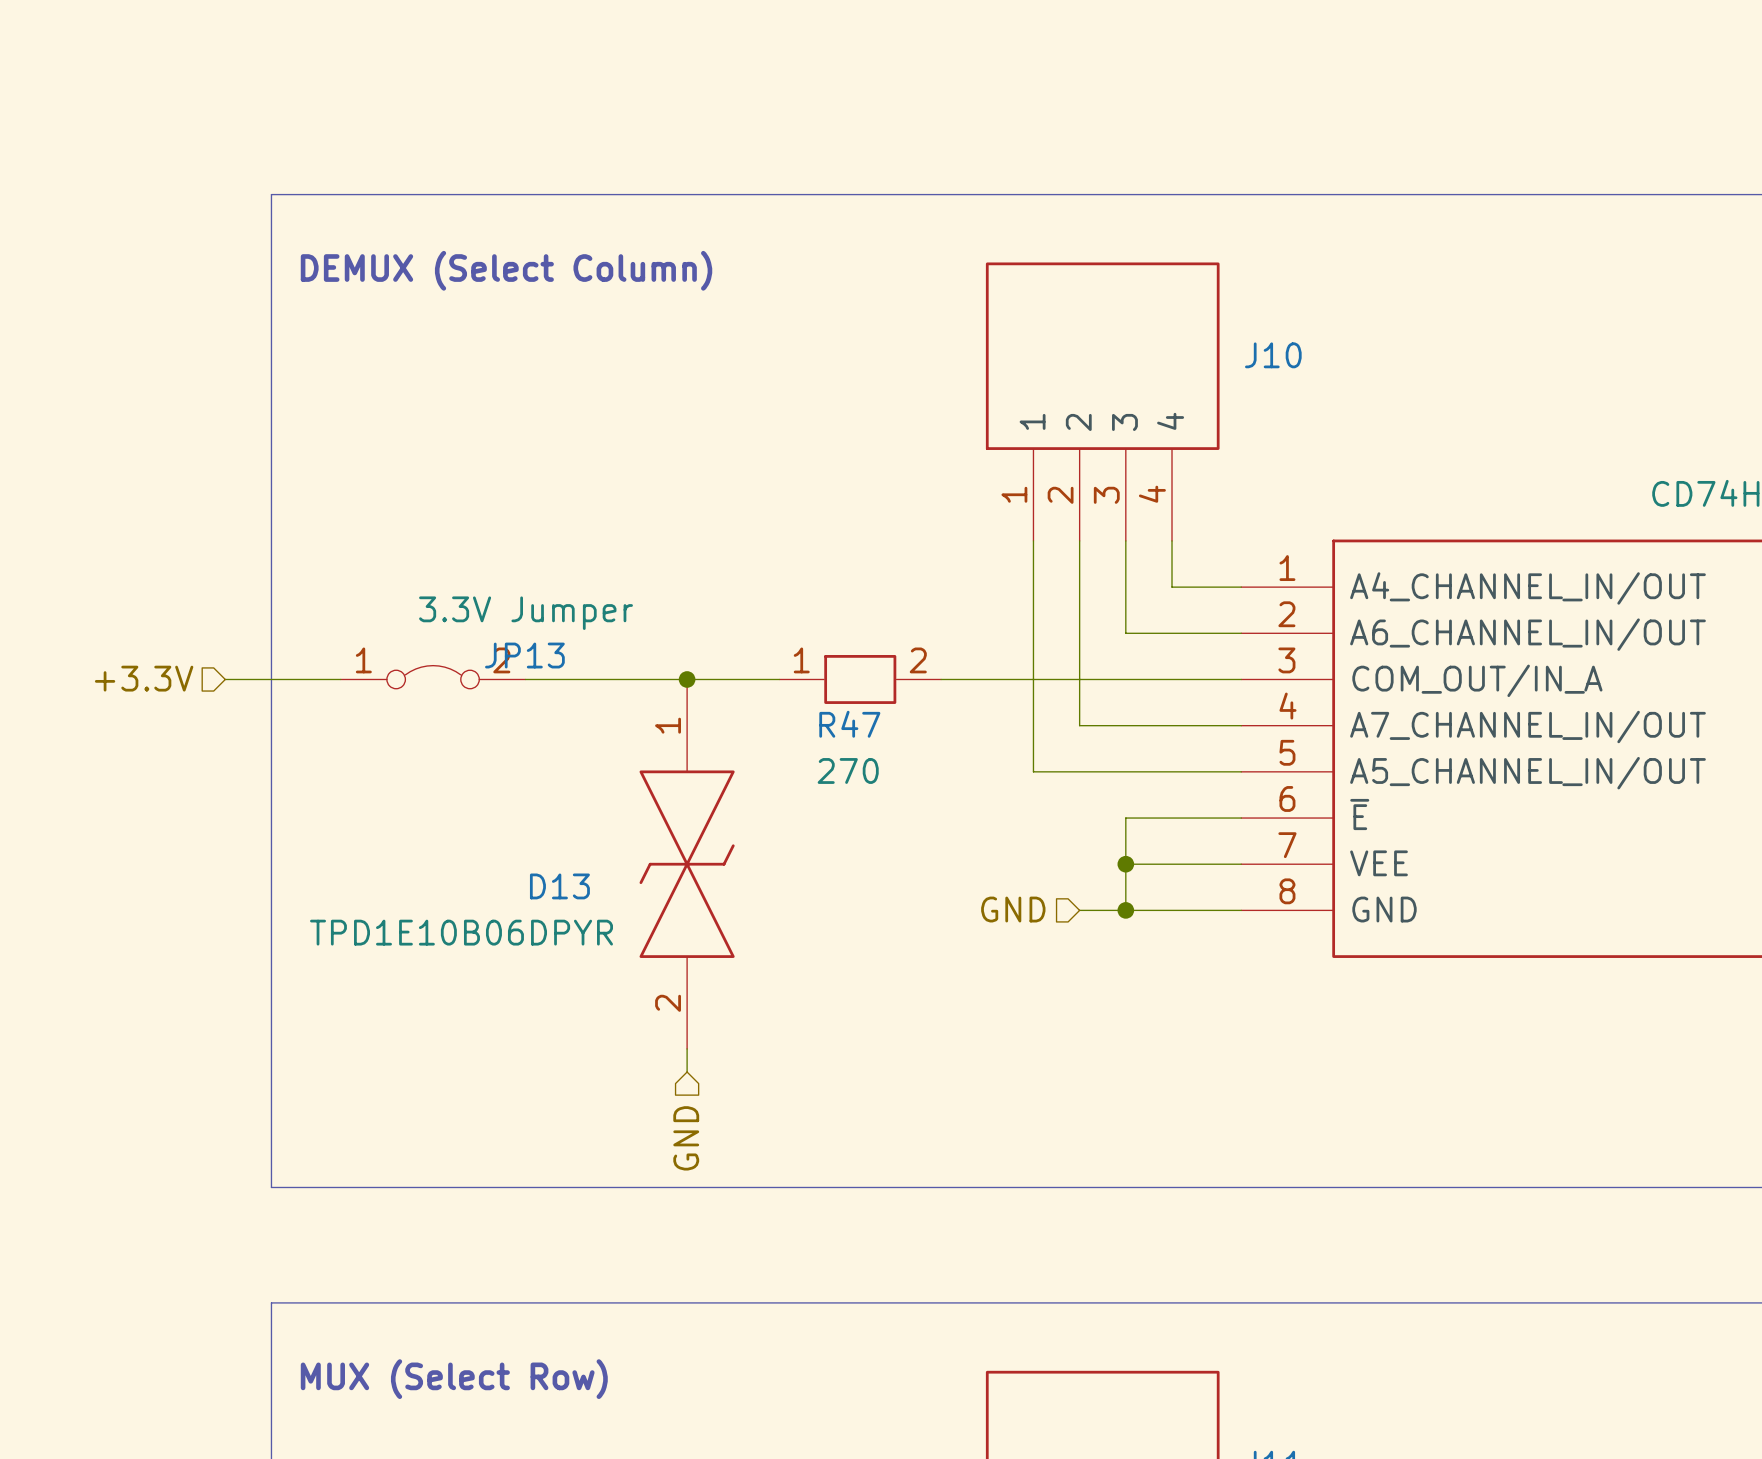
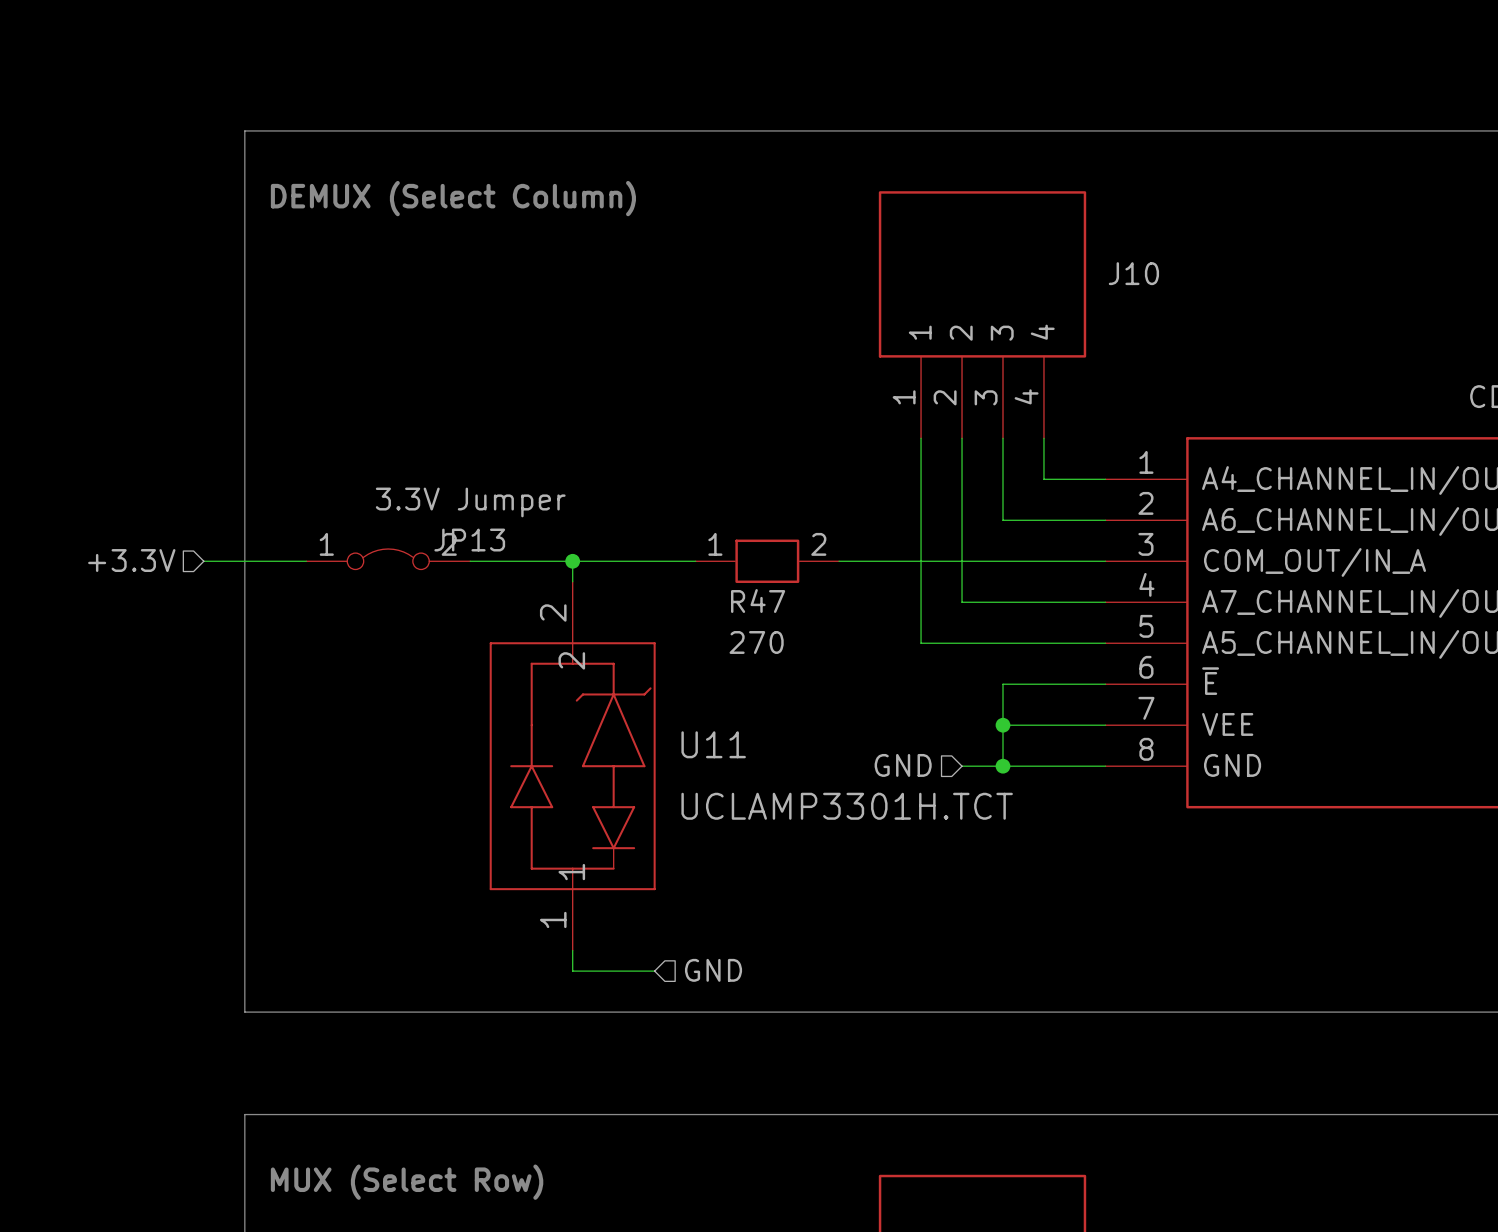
junction position: (687, 679) -> (572, 561)
D13: TPD1E10B06DPYR (687, 864) -> none
U11: none -> UCLAMP3301H.TCT (572, 766)
wire: (687, 1048) (687, 1072) -> (572, 561) (572, 581)
wire: none -> (572, 950) (572, 971) (654, 971)
hierarchical label rotation: 0° (686, 1138) -> 90° counterclockwise (713, 970)
hierarchical label position: GND (686, 1138) -> GND (713, 970)

